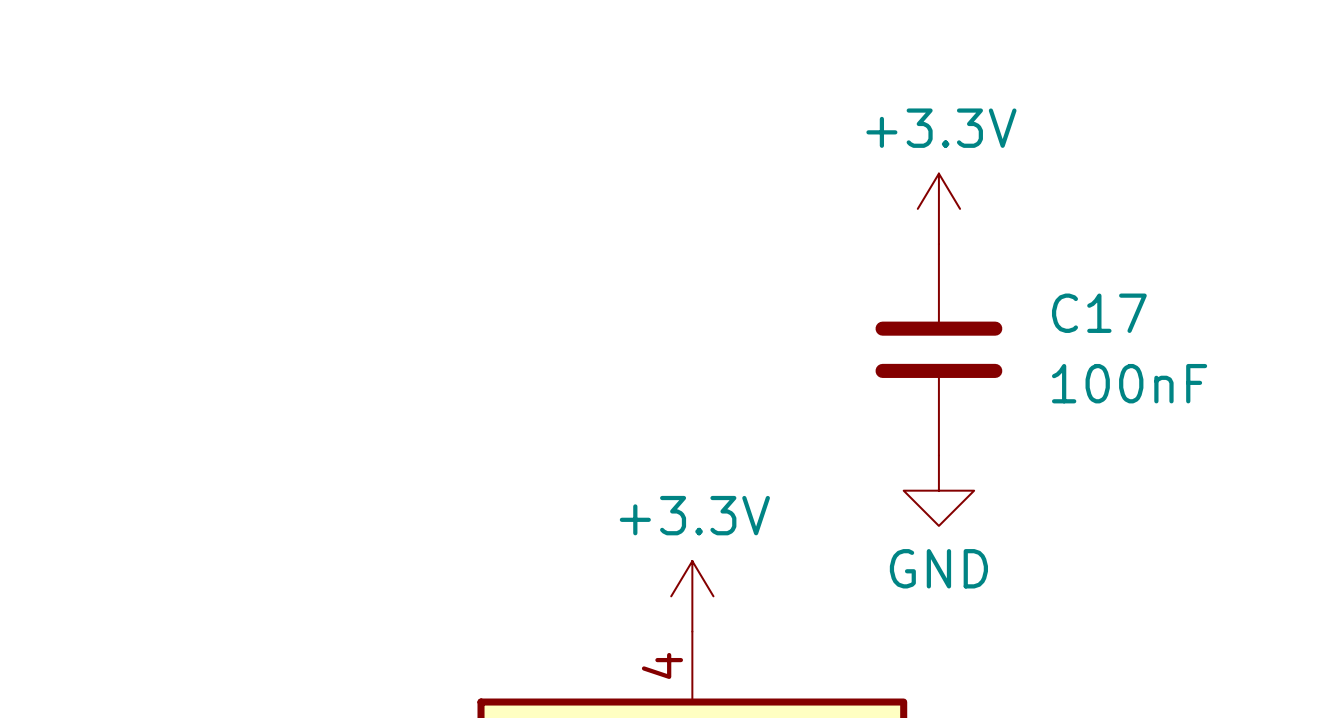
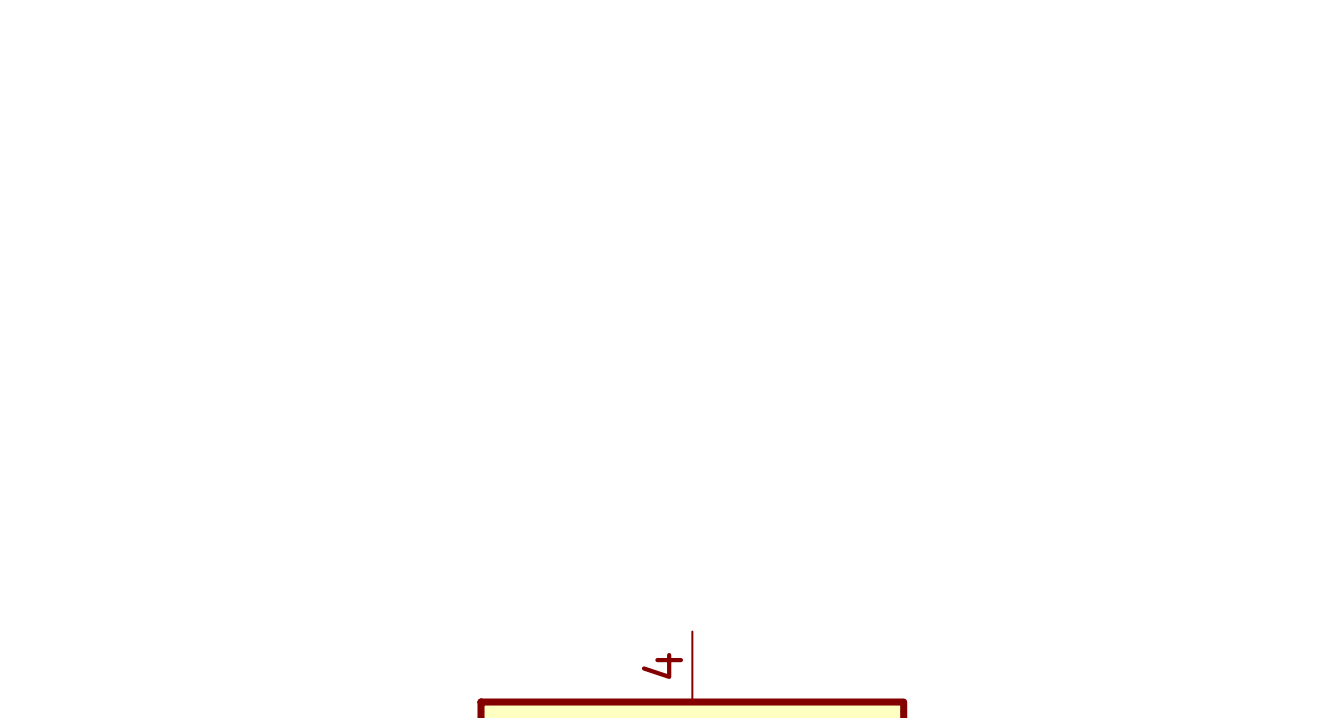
power symbol: +3.3V (938, 208) -> none
C17: 100nF (938, 349) -> none
power symbol: GND (938, 490) -> none
power symbol: +3.3V (692, 596) -> none

